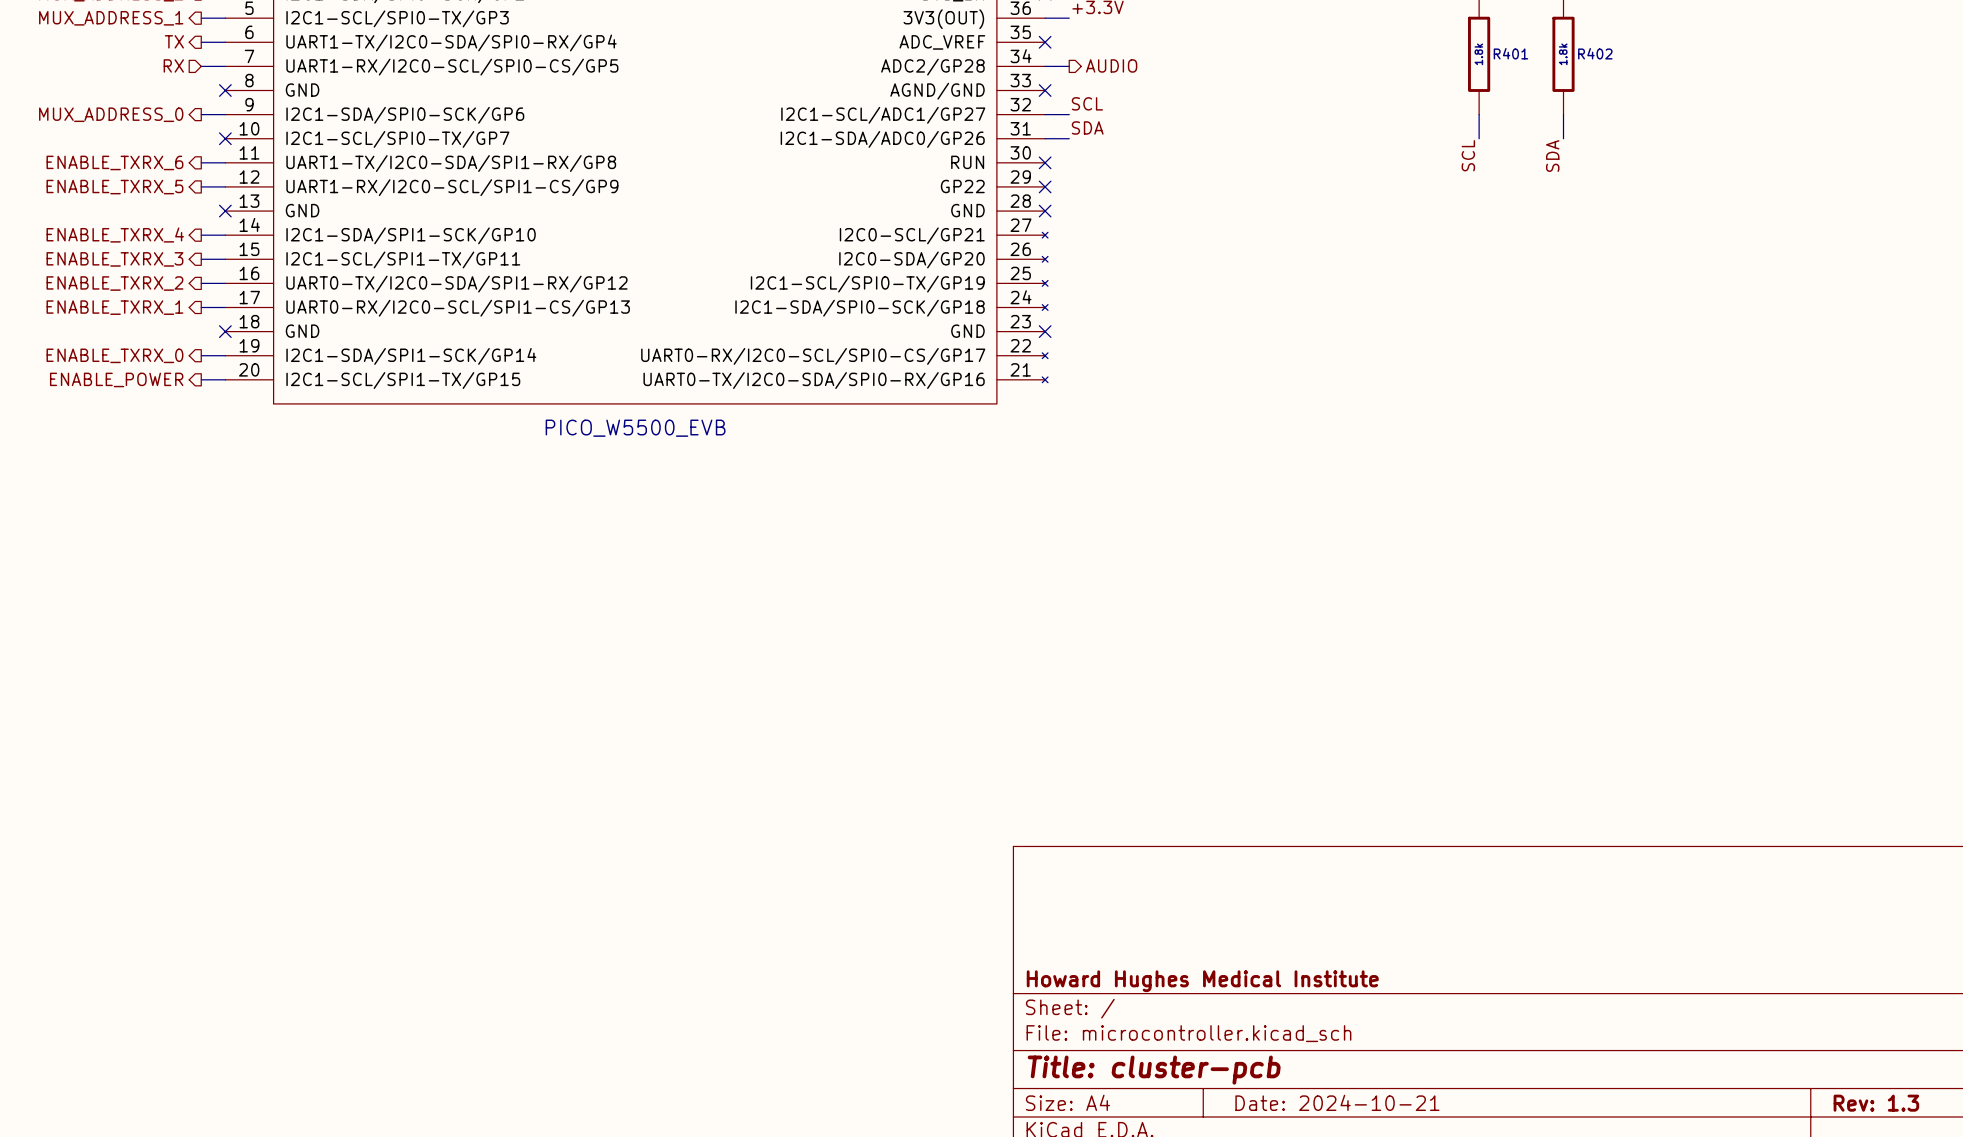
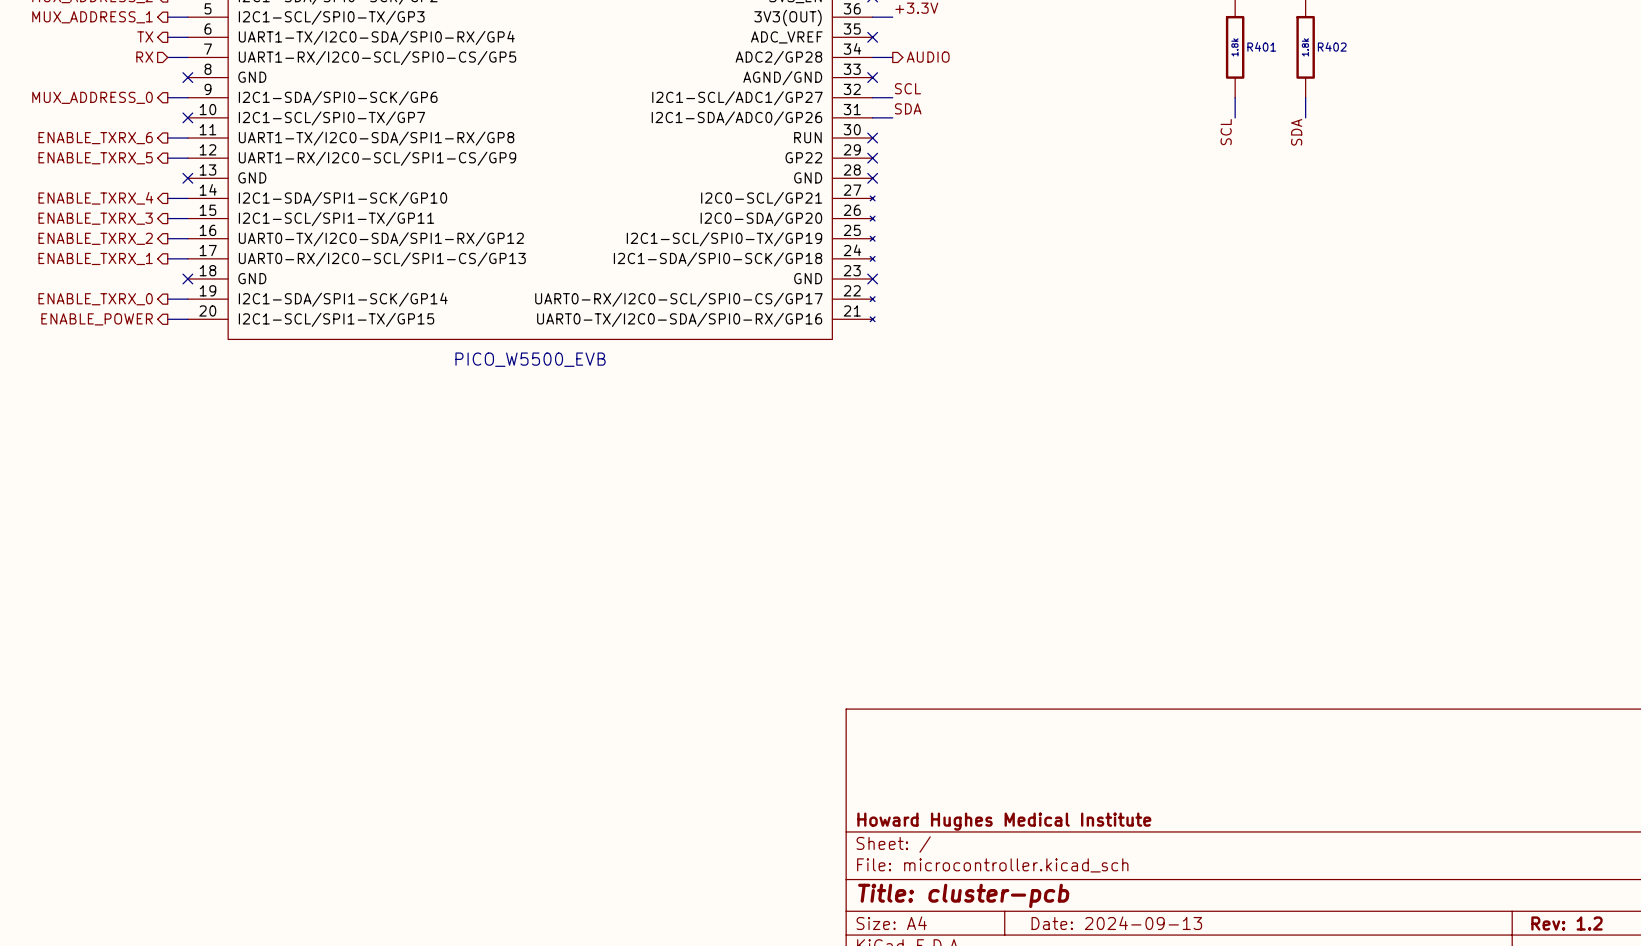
title block: Date: 2024-10-21 (1337, 1102) -> Date: 2024-09-13 (1116, 923)
title block: Rev: 1.3 (1876, 1103) -> Rev: 1.2 (1567, 923)

